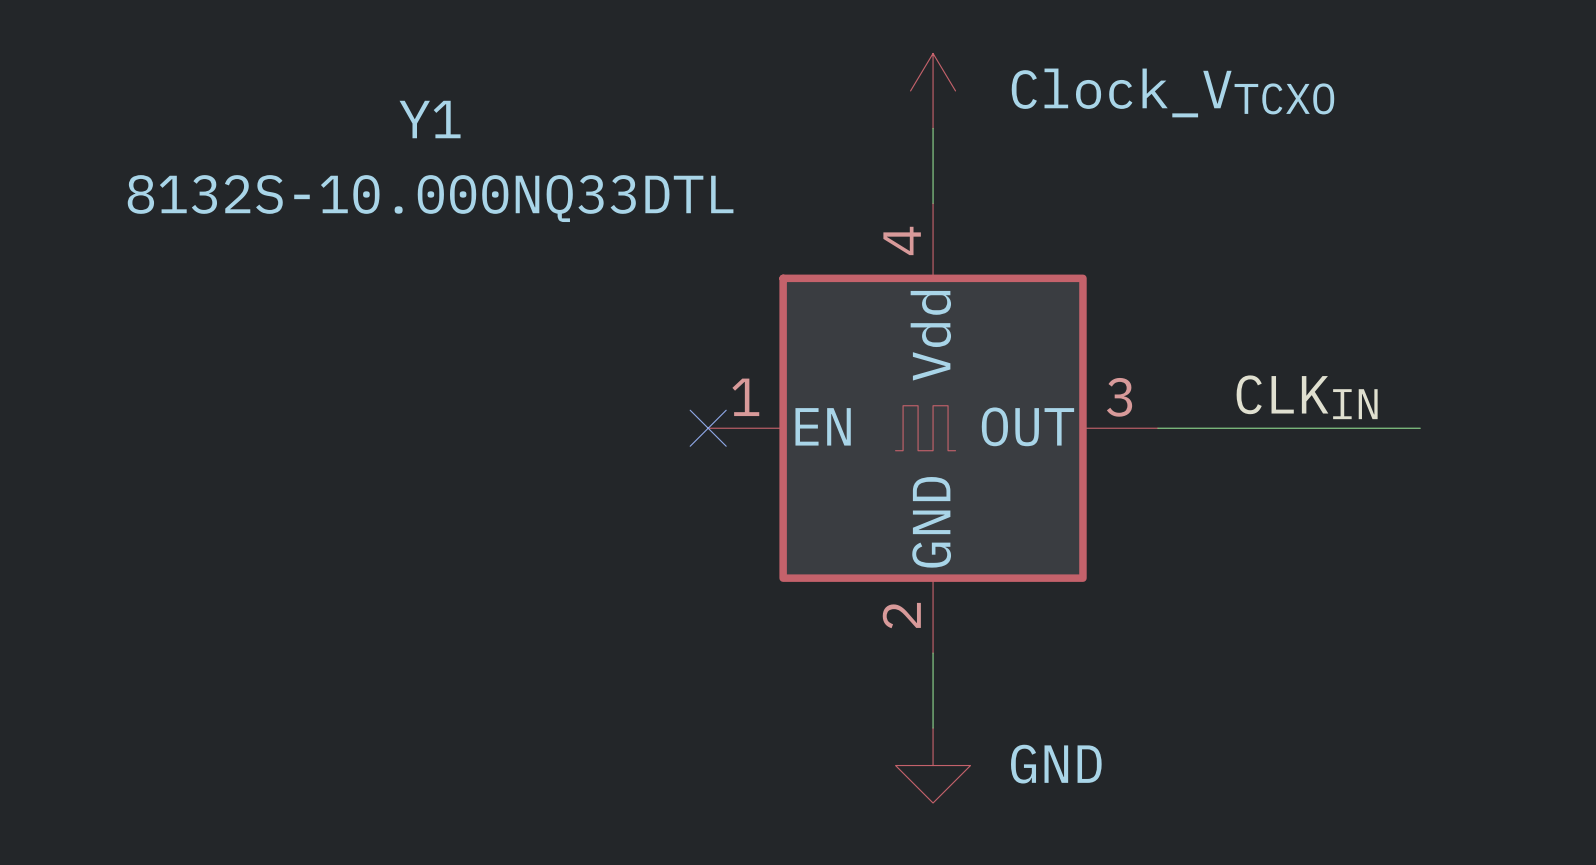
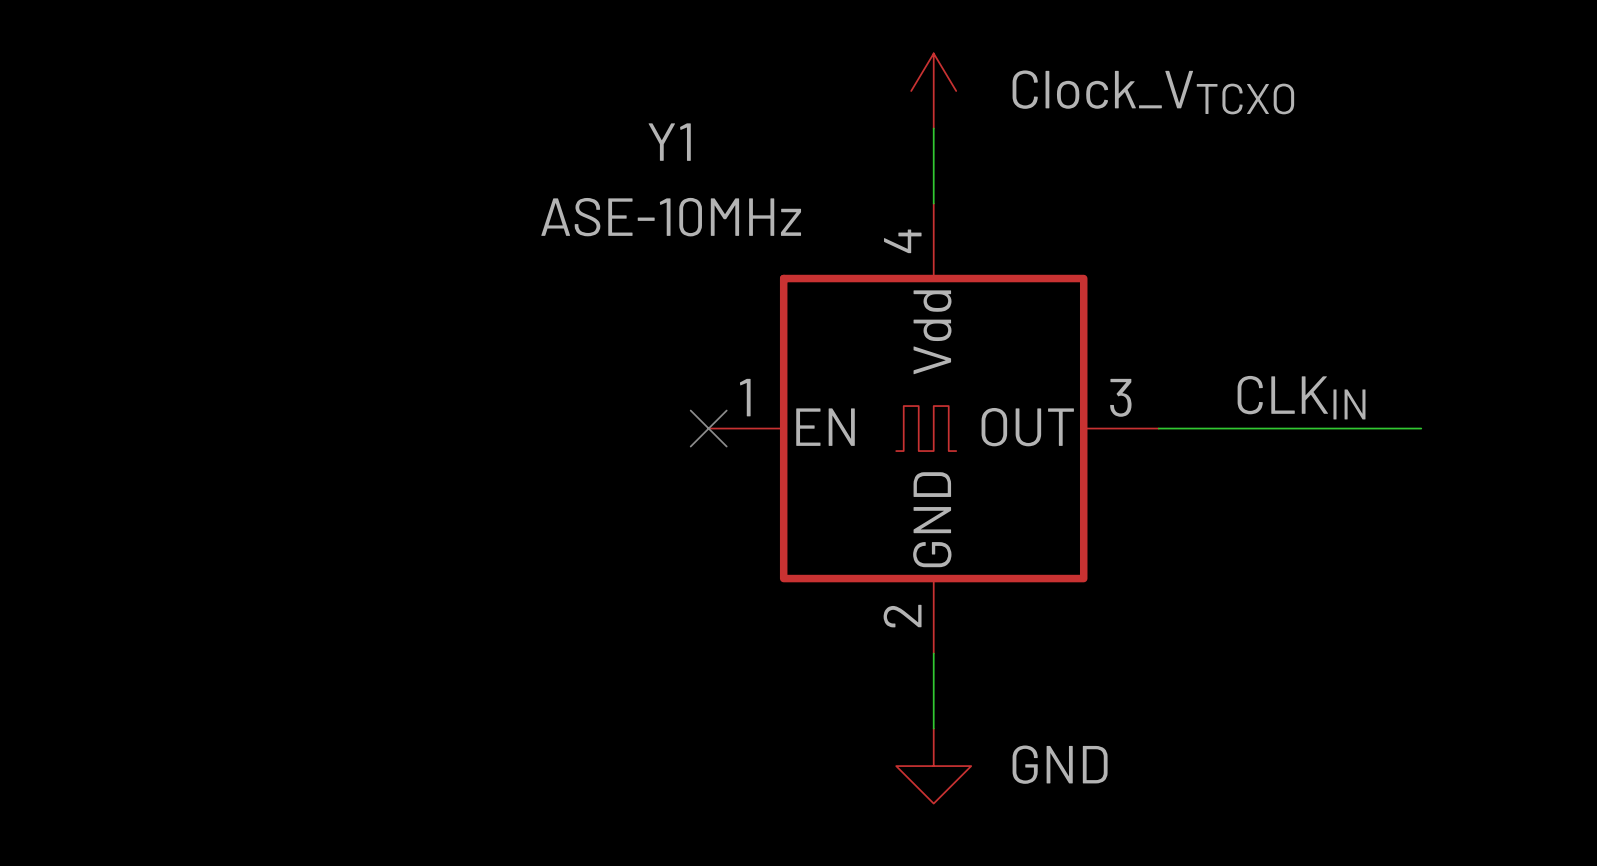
Y1 name position: Y1 (430, 119) -> Y1 (669, 142)
Y1 value: 8132S-10.000NQ33DTL (430, 198) -> ASE-10MHz (671, 217)

